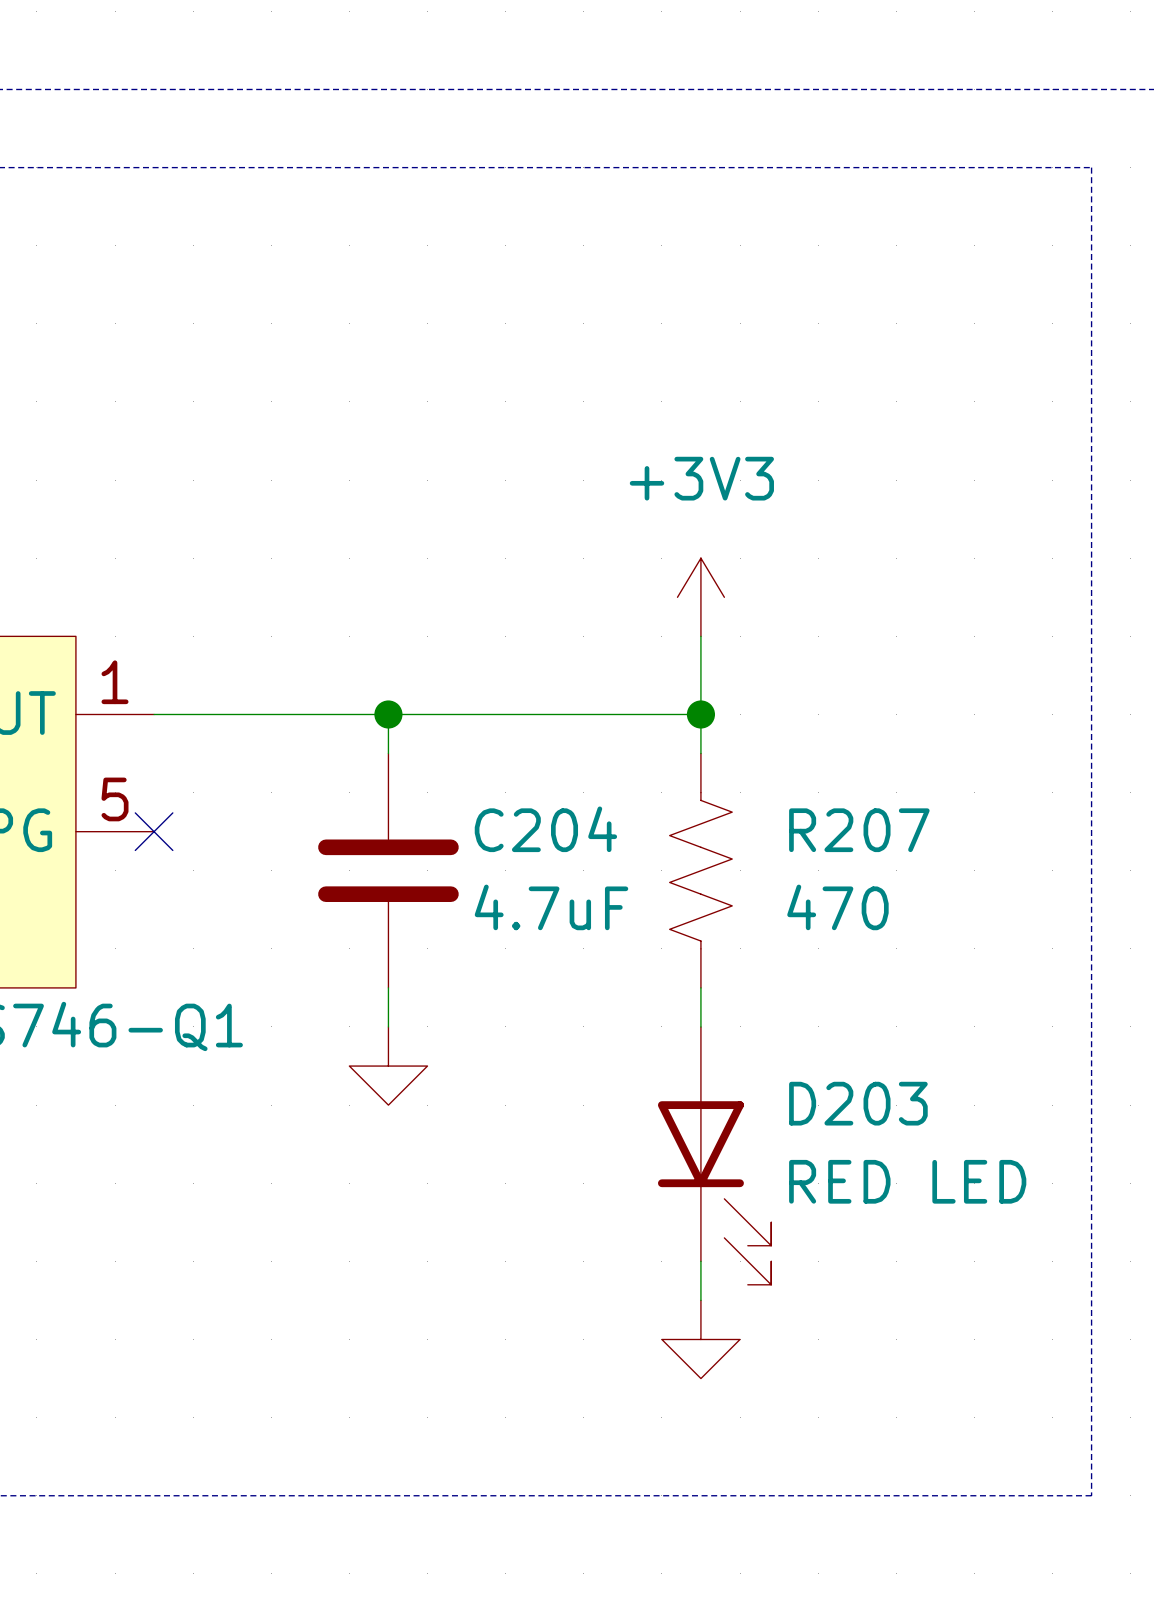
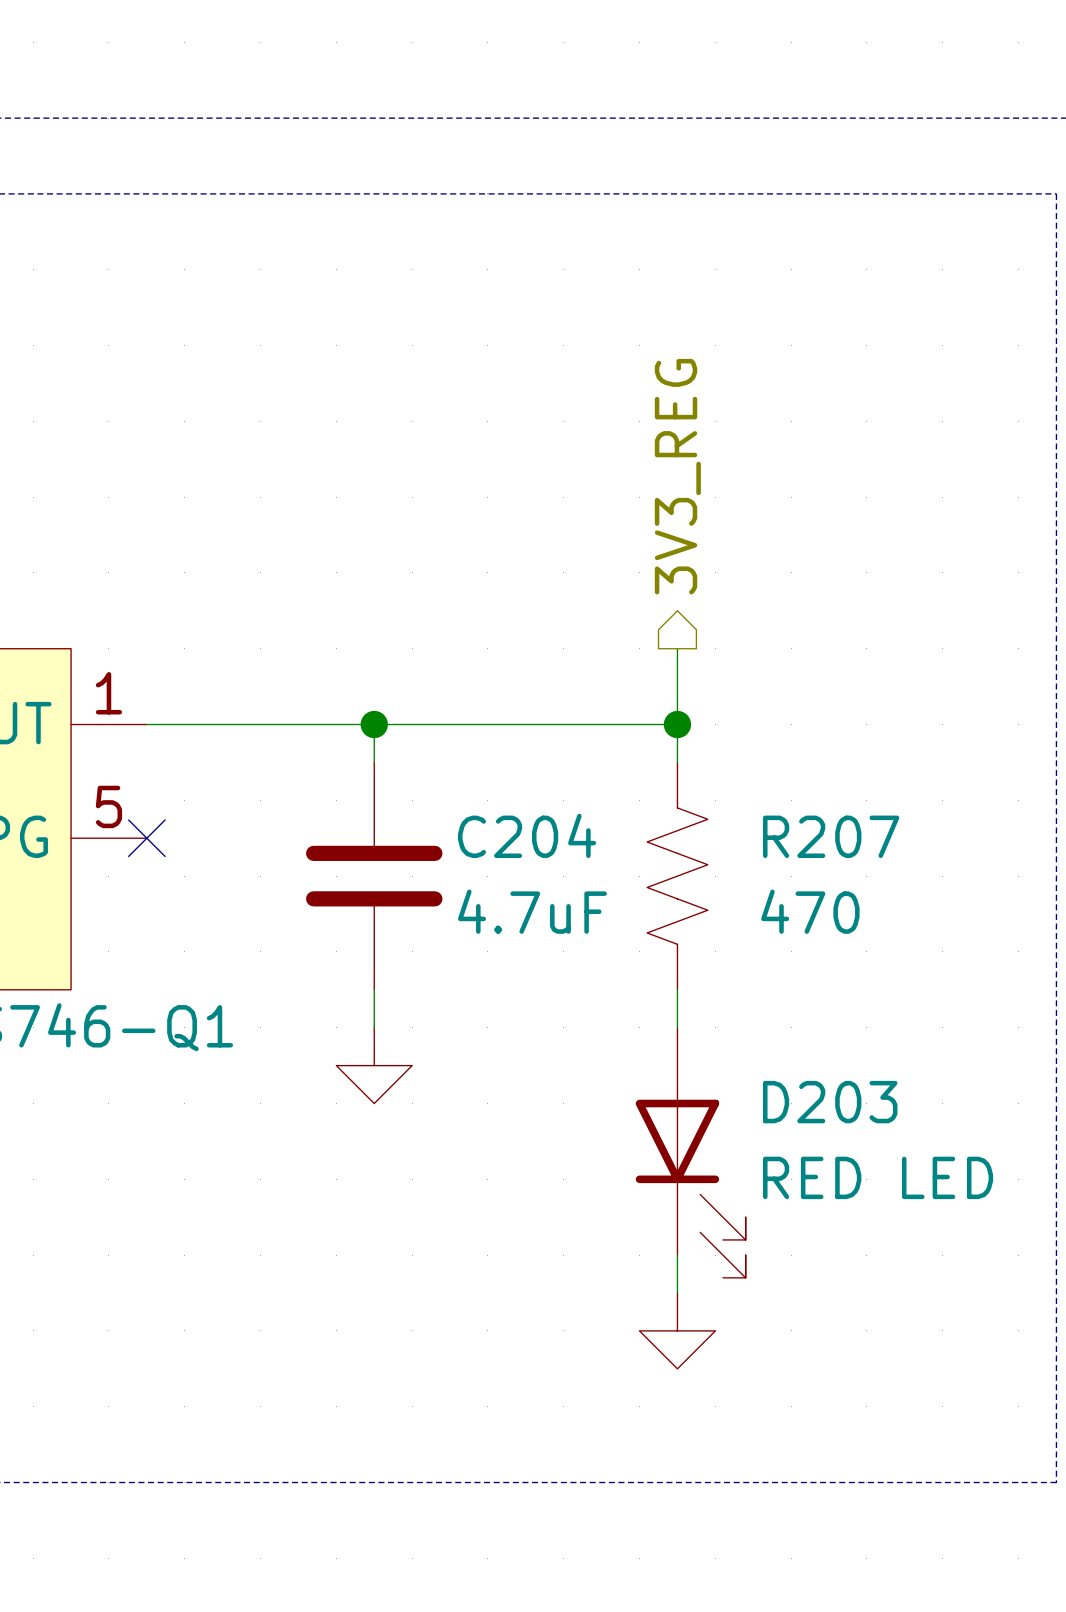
hierarchical label: none -> 3V3_REG (677, 476)
power symbol: +3V3 (700, 597) -> none

